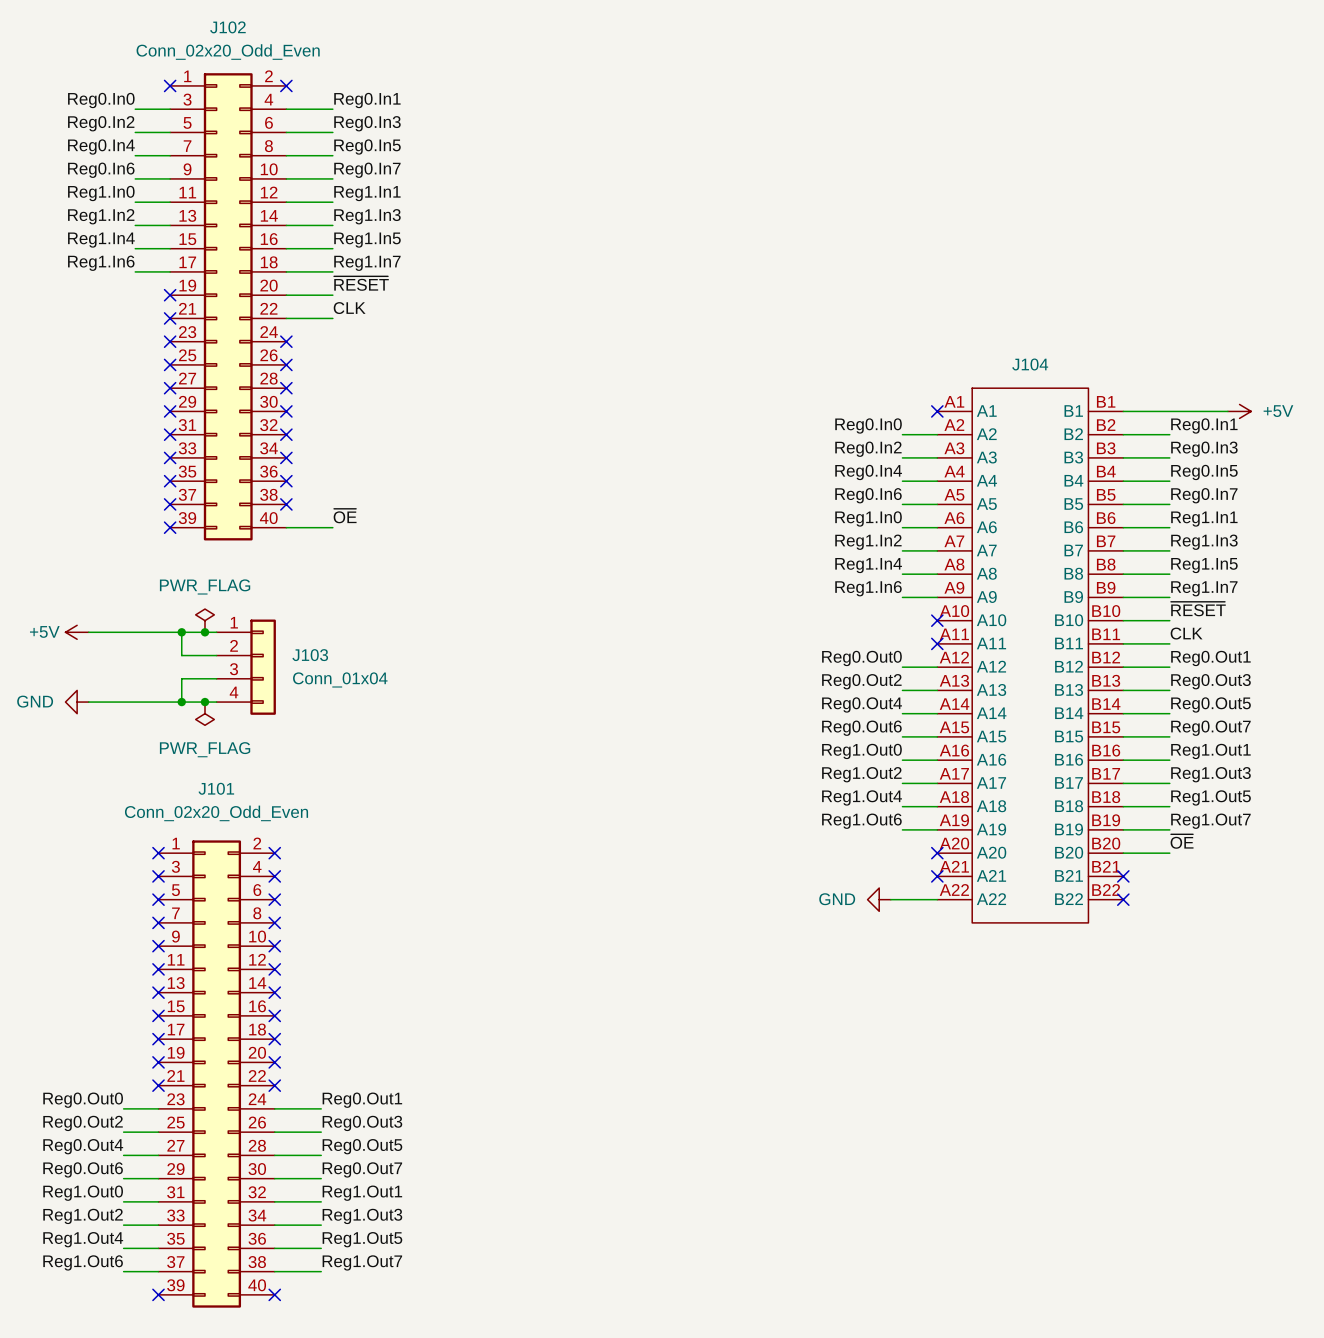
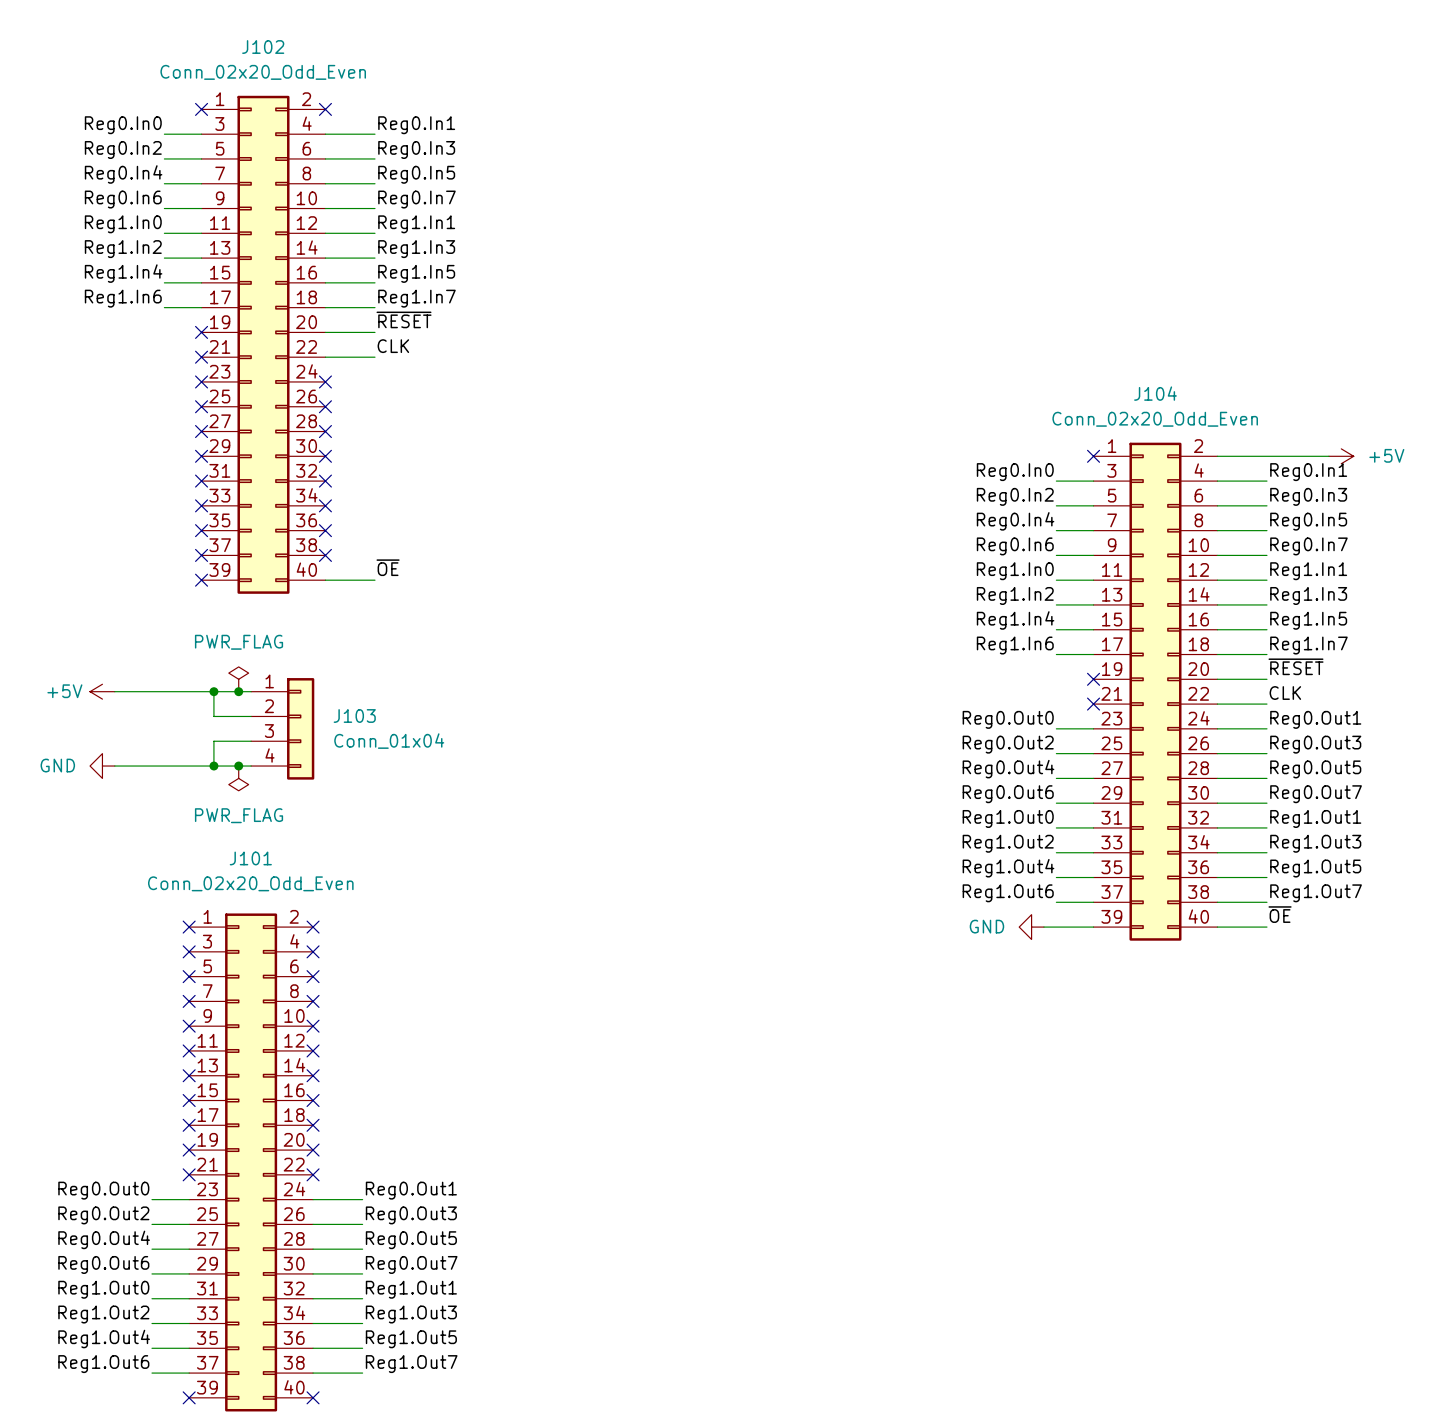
J104 value: none -> Conn_02x20_Odd_Even (1155, 419)
J104 symbol: [937, 388, 1124, 923] -> [1093, 442, 1218, 941]
no-connect mark: (937, 411) -> none
no-connect mark: none -> (1093, 456)
label position: Reg0.In0 (868, 425) -> Reg0.In0 (1015, 472)
wire: (902, 434) (937, 434) -> (1056, 481) (1093, 481)
label position: Reg0.In2 (868, 449) -> Reg0.In2 (1015, 496)
wire: (902, 457) (937, 457) -> (1056, 505) (1093, 505)
label position: Reg0.In4 (868, 472) -> Reg0.In4 (1015, 521)
wire: (902, 481) (937, 481) -> (1056, 530) (1093, 530)
label position: Reg0.In6 (868, 495) -> Reg0.In6 (1015, 546)
wire: (902, 504) (937, 504) -> (1056, 555) (1093, 555)
label position: Reg1.In0 (868, 518) -> Reg1.In0 (1015, 571)
wire: (902, 527) (937, 527) -> (1056, 580) (1093, 580)
label position: Reg1.In2 (868, 542) -> Reg1.In2 (1015, 595)
wire: (902, 550) (937, 550) -> (1056, 604) (1093, 604)
label position: Reg1.In4 (868, 565) -> Reg1.In4 (1015, 620)
wire: (902, 574) (937, 574) -> (1056, 629) (1093, 629)
label position: Reg1.In6 (868, 588) -> Reg1.In6 (1015, 645)
wire: (902, 597) (937, 597) -> (1056, 654) (1093, 654)
no-connect mark: (937, 620) -> none
no-connect mark: none -> (1093, 679)
no-connect mark: (937, 643) -> none
no-connect mark: none -> (1093, 704)
label position: Reg0.Out0 (861, 658) -> Reg0.Out0 (1008, 719)
wire: (902, 667) (937, 667) -> (1056, 728) (1093, 728)
label position: Reg0.Out2 (861, 681) -> Reg0.Out2 (1008, 744)
wire: (902, 690) (937, 690) -> (1056, 753) (1093, 753)
label position: Reg0.Out4 (862, 704) -> Reg0.Out4 (1008, 769)
wire: (902, 713) (937, 713) -> (1056, 778) (1093, 778)
label position: Reg0.Out6 (861, 728) -> Reg0.Out6 (1008, 794)
wire: (902, 736) (937, 736) -> (1056, 803) (1093, 803)
label position: Reg1.Out0 (861, 751) -> Reg1.Out0 (1008, 818)
wire: (902, 760) (937, 760) -> (1056, 827) (1093, 827)
label position: Reg1.Out2 (861, 774) -> Reg1.Out2 (1008, 843)
wire: (902, 783) (937, 783) -> (1056, 852) (1093, 852)
label position: Reg1.Out4 (862, 797) -> Reg1.Out4 (1008, 868)
wire: (902, 806) (937, 806) -> (1056, 877) (1093, 877)
label position: Reg1.Out6 (861, 821) -> Reg1.Out6 (1008, 893)
wire: (902, 829) (937, 829) -> (1056, 902) (1093, 902)
no-connect mark: (937, 853) -> none
no-connect mark: (937, 876) -> none
no-connect mark: (1123, 876) -> none
power symbol position: GND (879, 899) -> GND (1031, 927)
wire: (890, 899) (937, 899) -> (1043, 927) (1093, 927)
no-connect mark: (1123, 899) -> none

